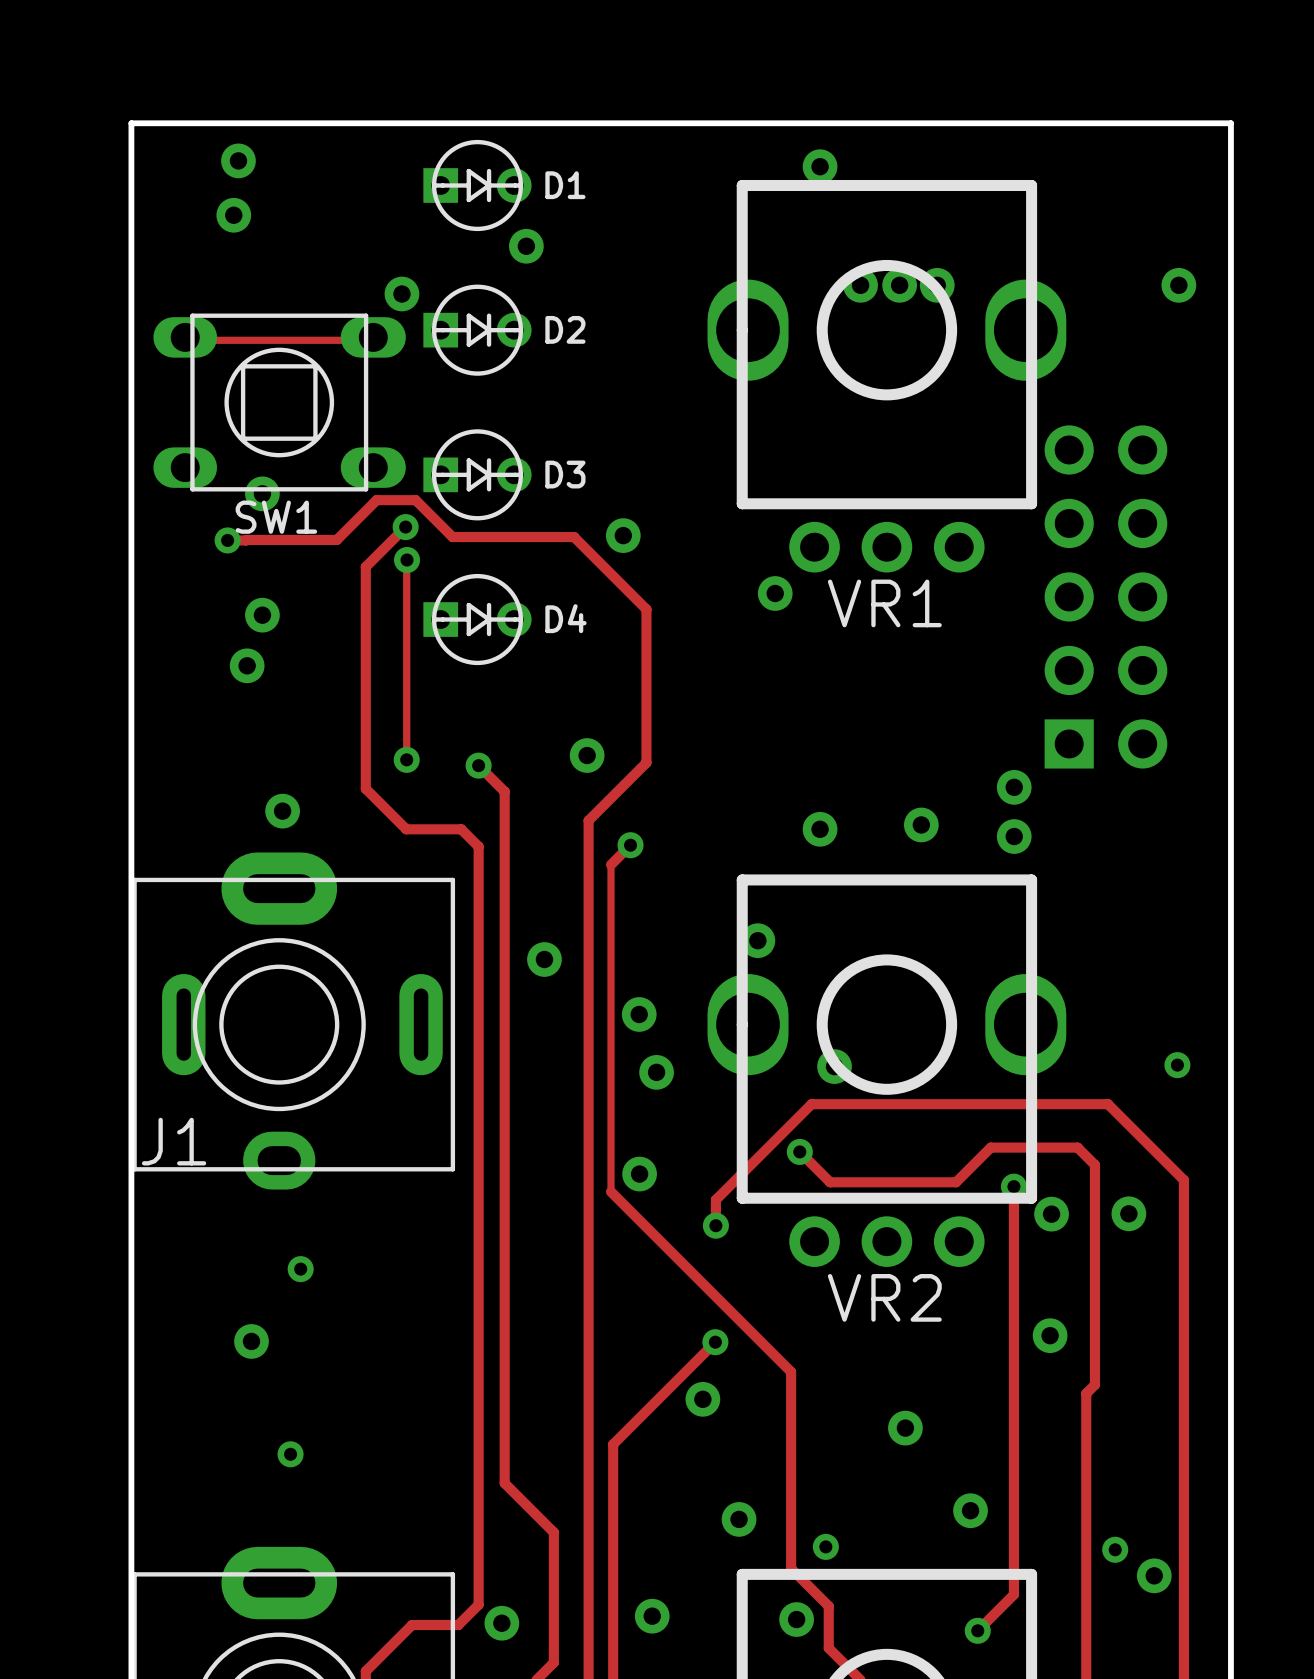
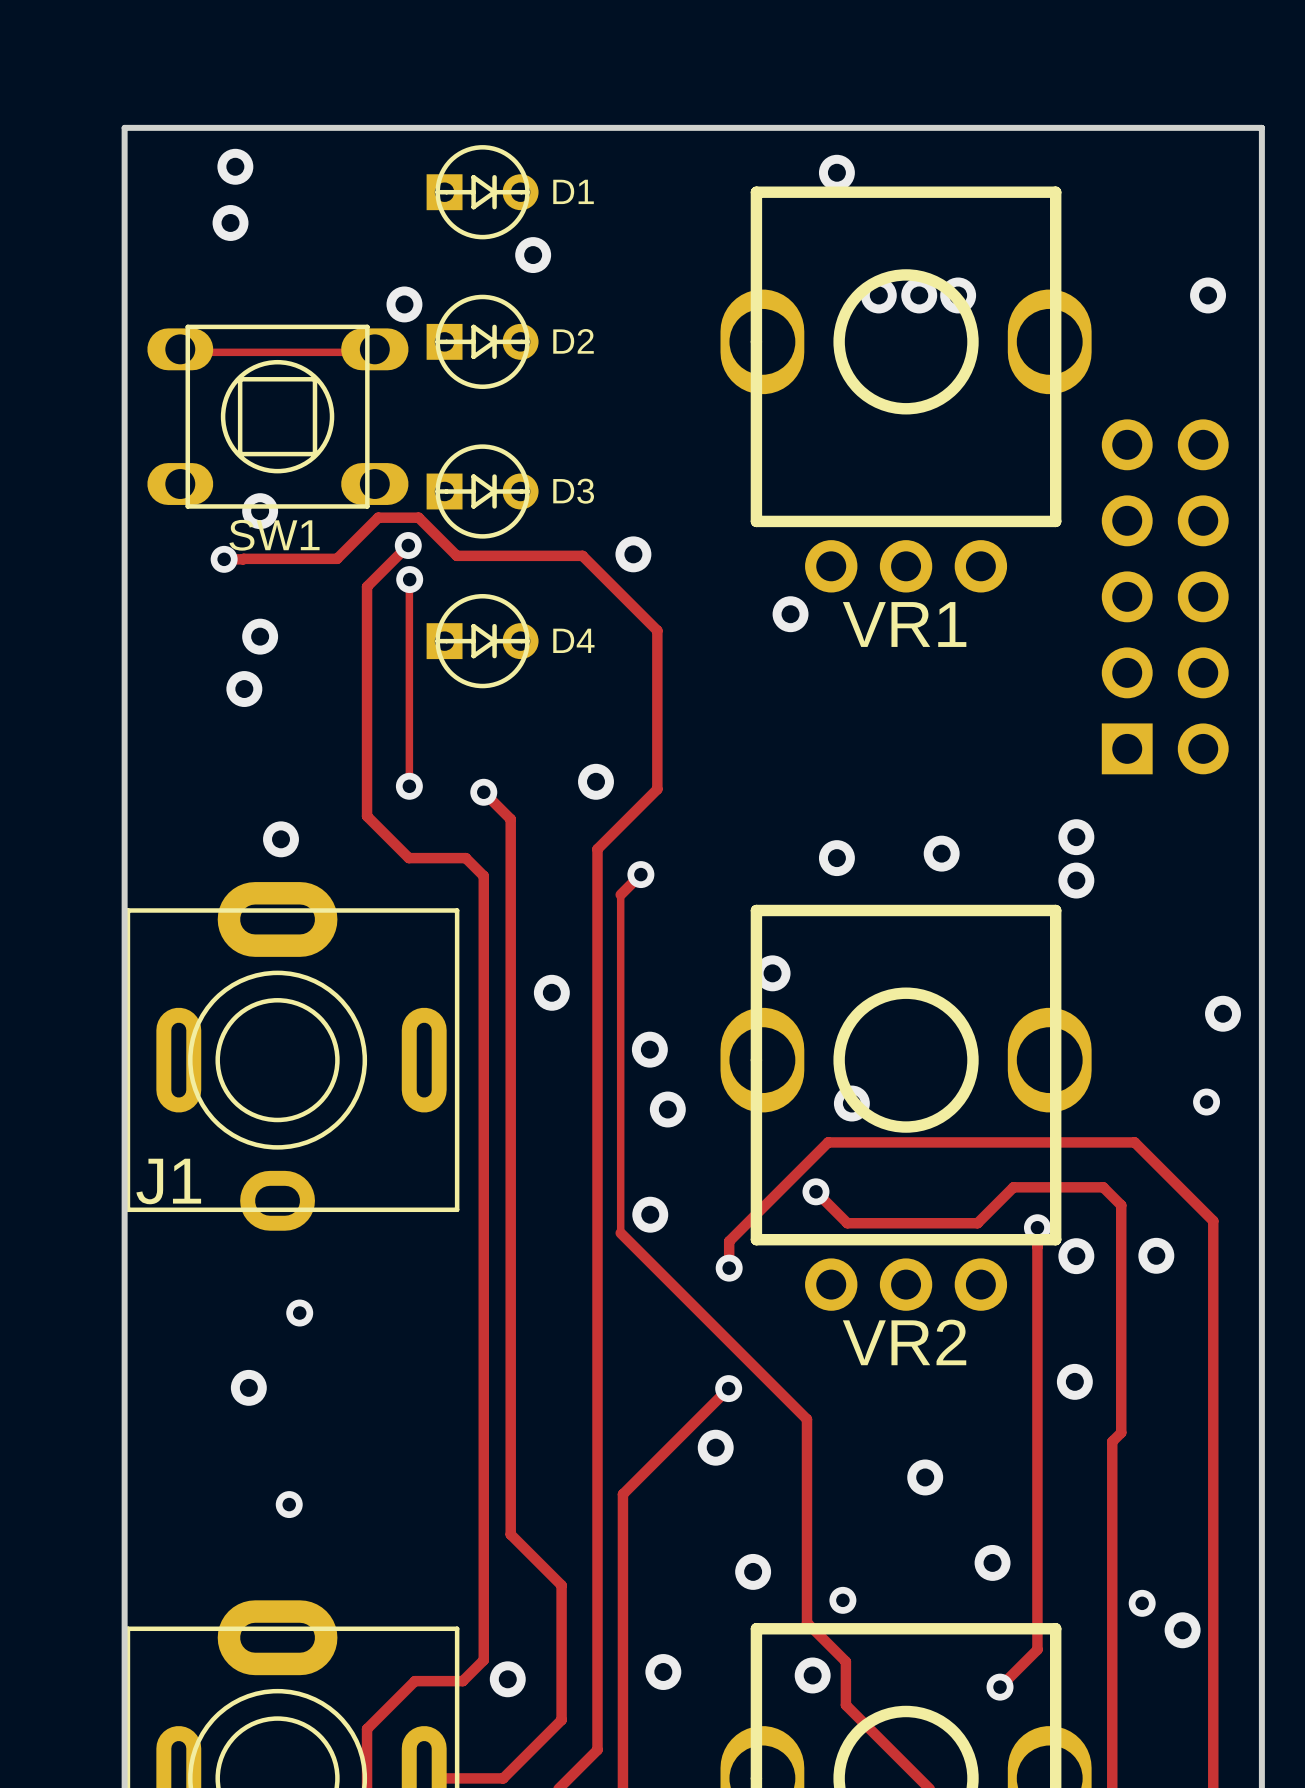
part position: (1105, 596) -> (1165, 596)
via: (1014, 787) -> none
via: none -> (1076, 837)
via: (1014, 836) -> none
via: none -> (1076, 880)
via: none -> (1223, 1013)

